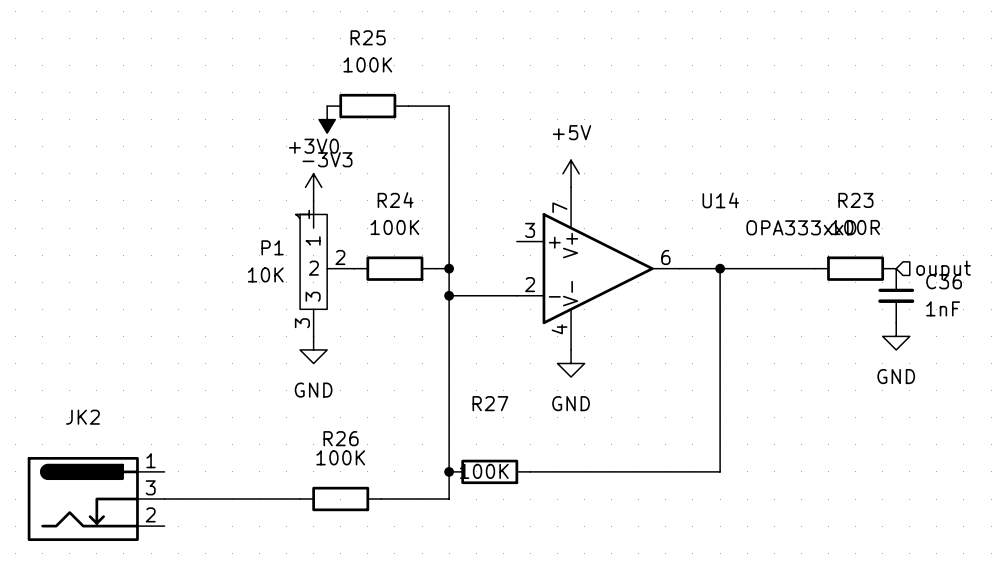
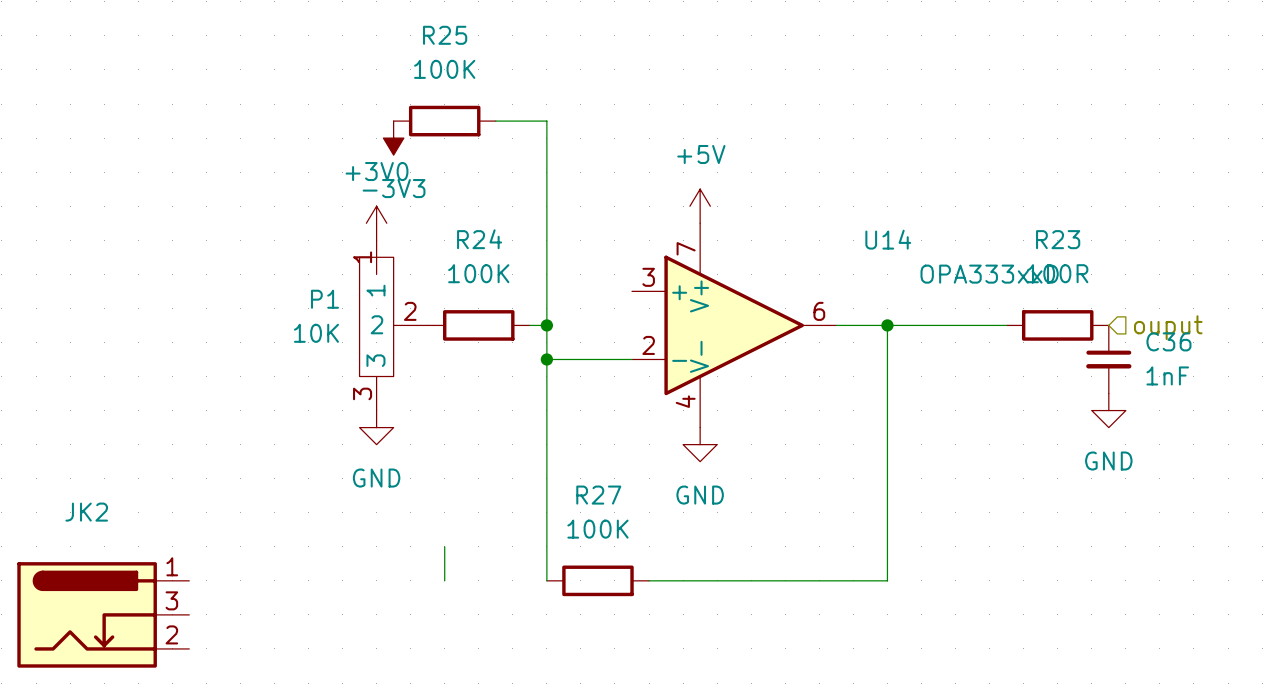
wire: none -> (444, 546) (444, 580)
wire: (449, 471) (449, 499) (381, 499) -> none
junction: (449, 471) -> none
R27 value position: 100K (484, 471) -> 100K (597, 529)
wire: (164, 499) (300, 499) -> none
R26: 100K (340, 499) -> none

